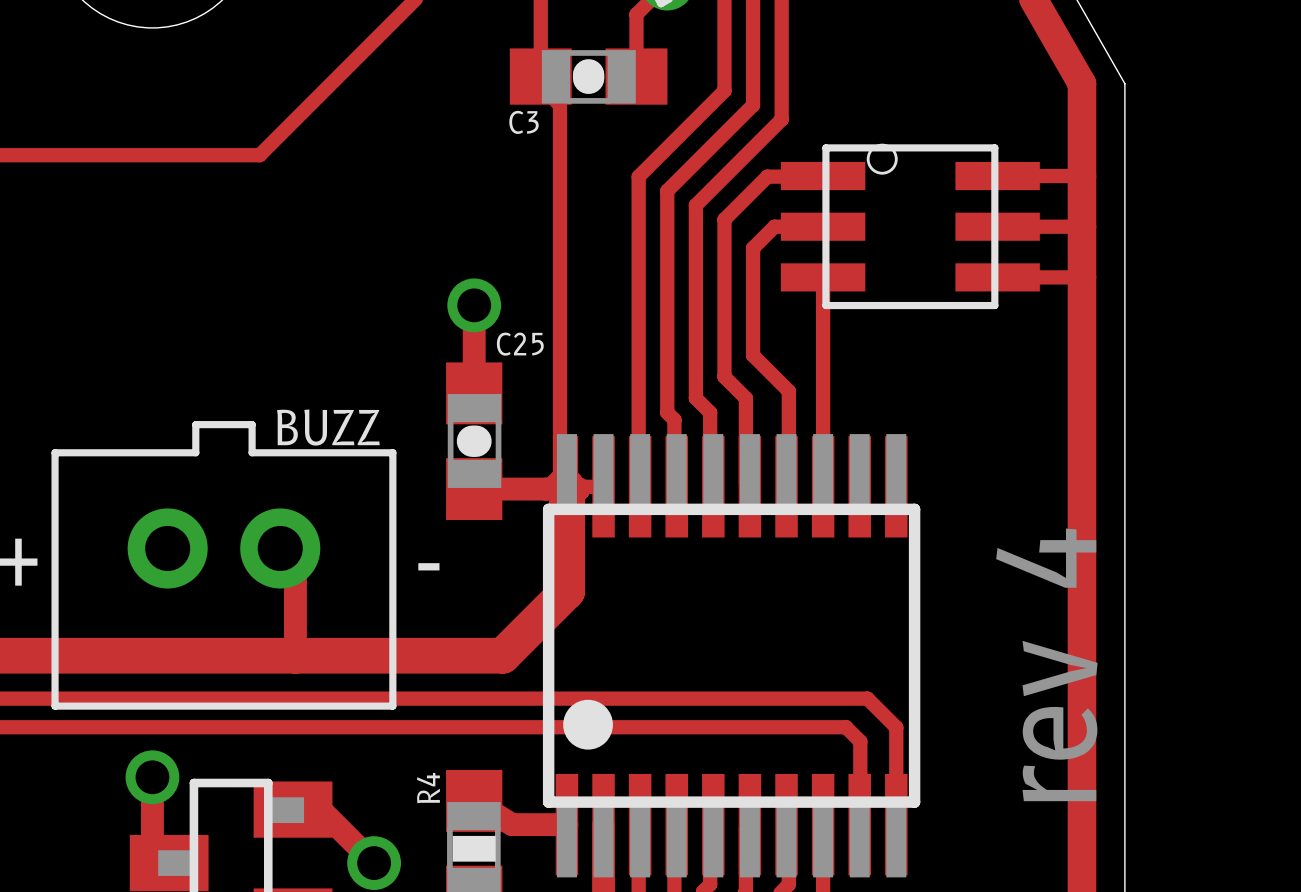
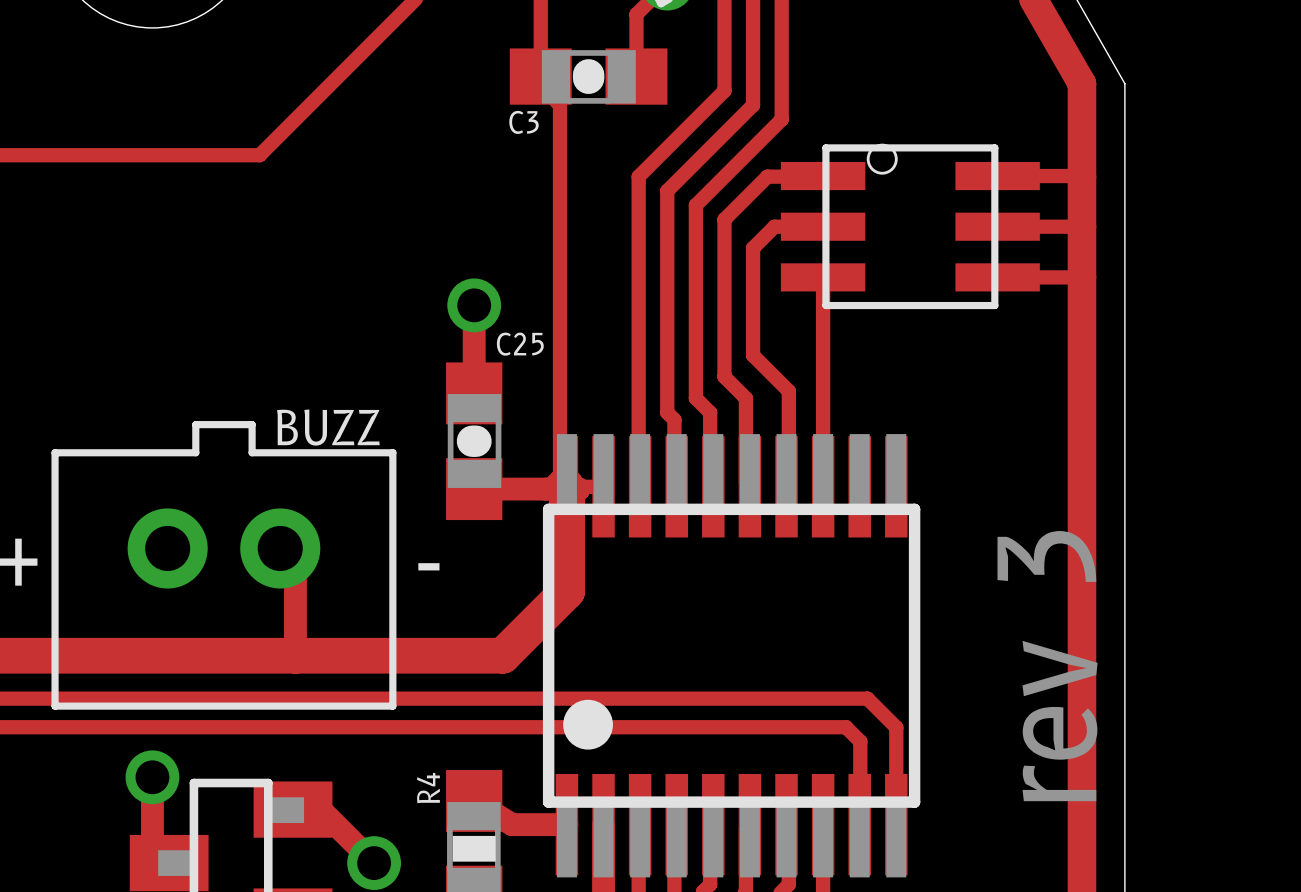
text: rev 4 (1046, 664) -> rev 3 (1047, 666)

